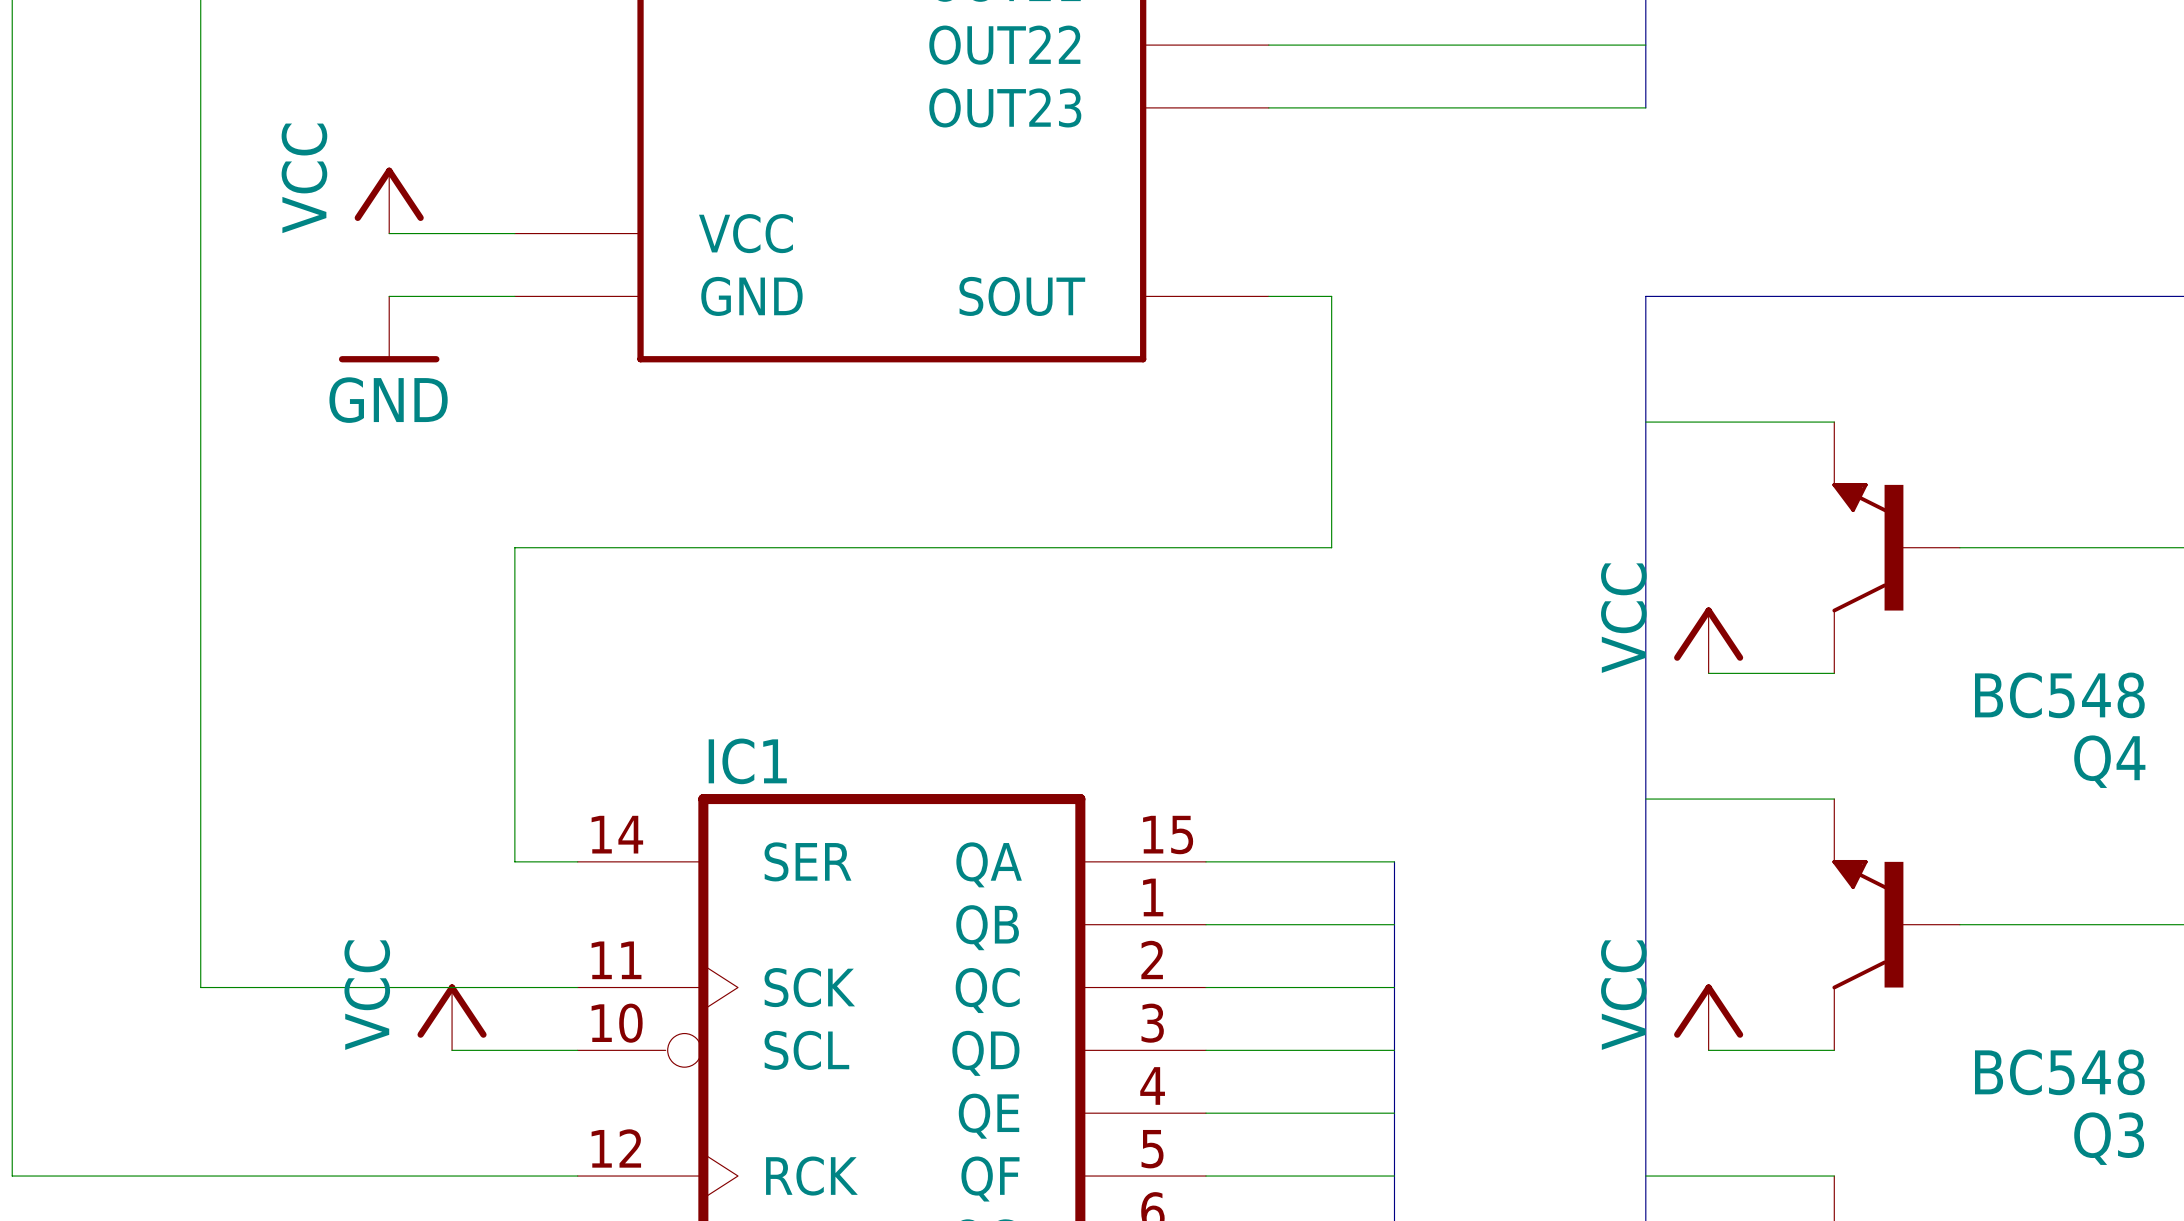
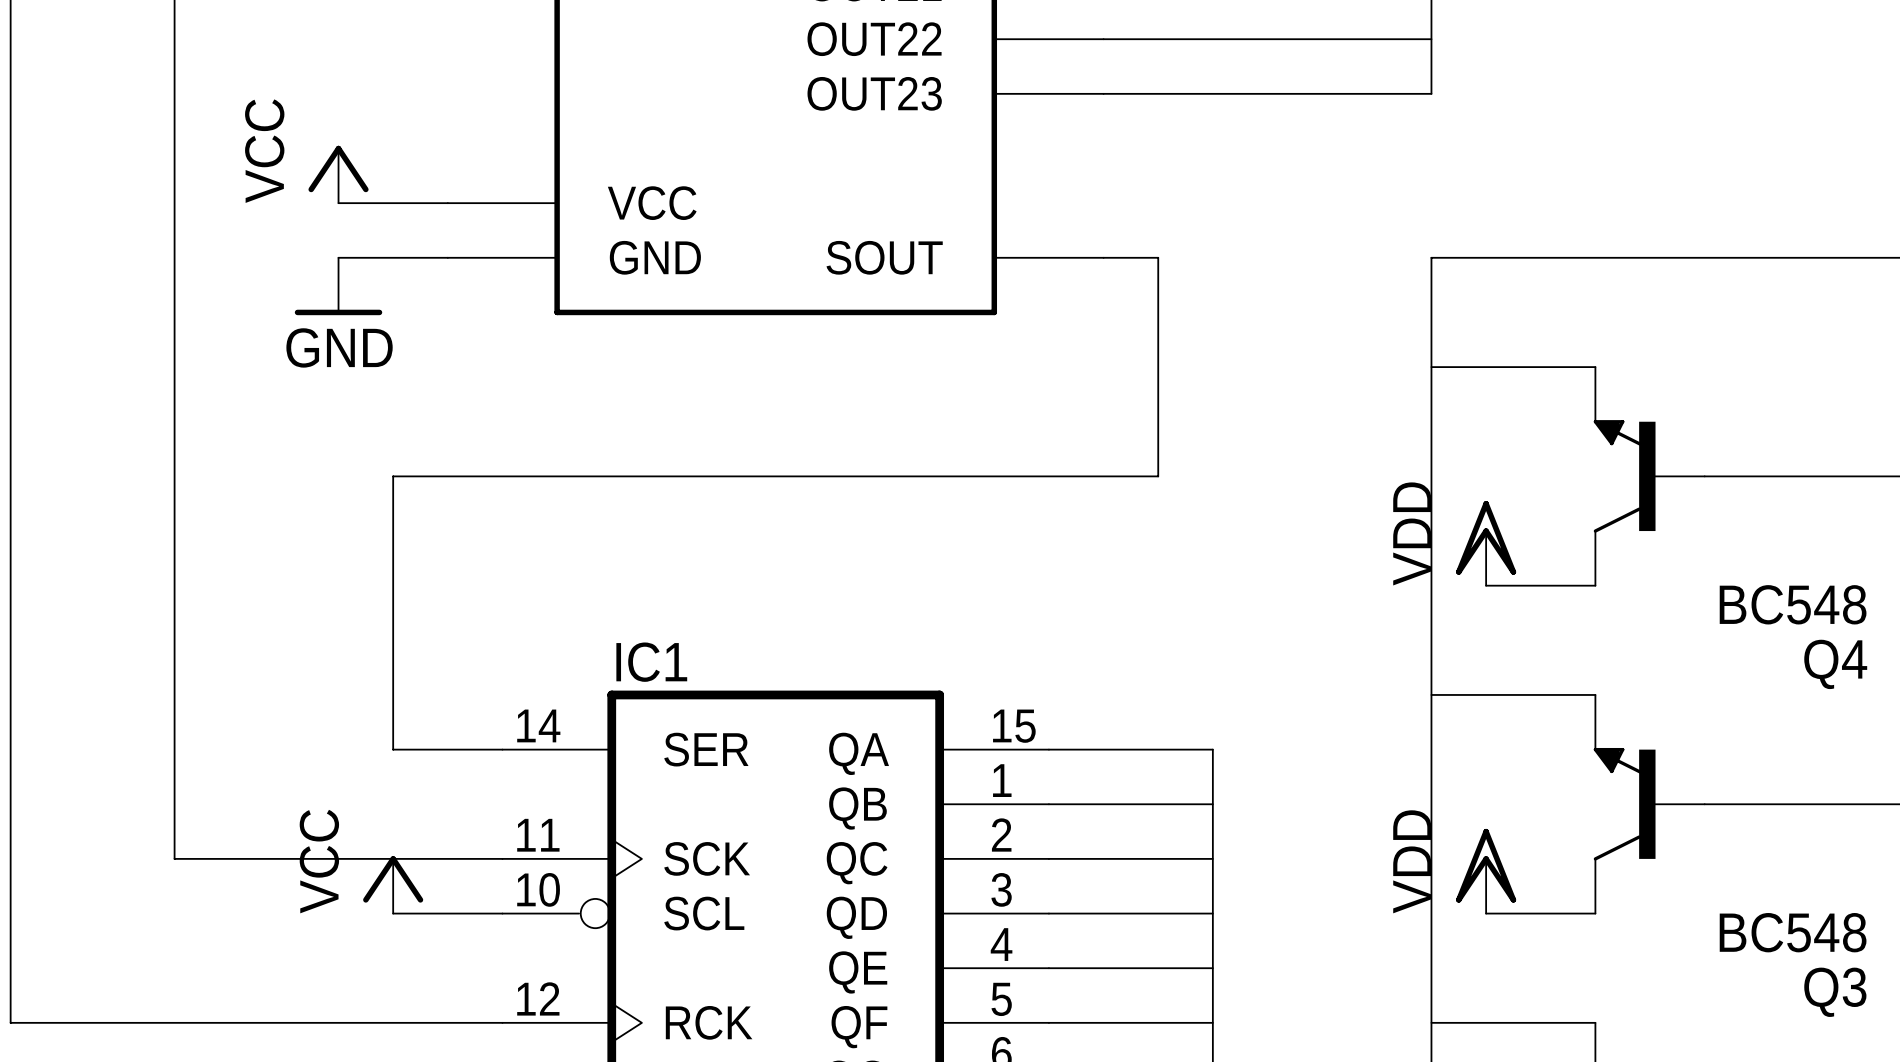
wire: (514, 547) (514, 861) -> (447, 476) (393, 476) (393, 749) (447, 749)
power symbol: VCC (1708, 640) -> VDD (1486, 543)
power symbol: VCC (1708, 1017) -> VDD (1486, 871)

